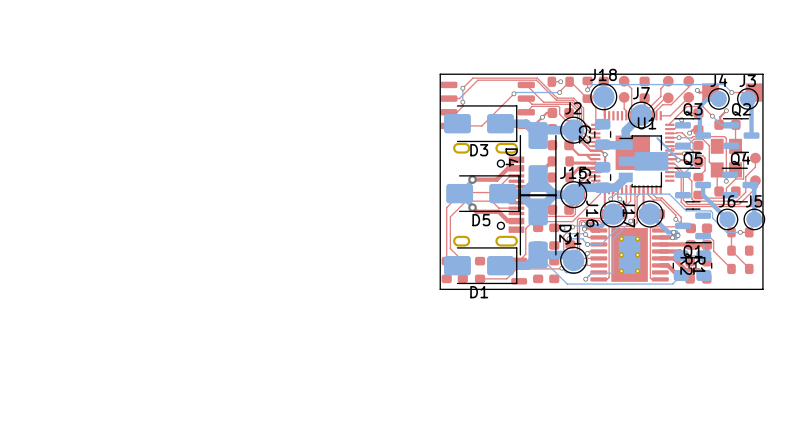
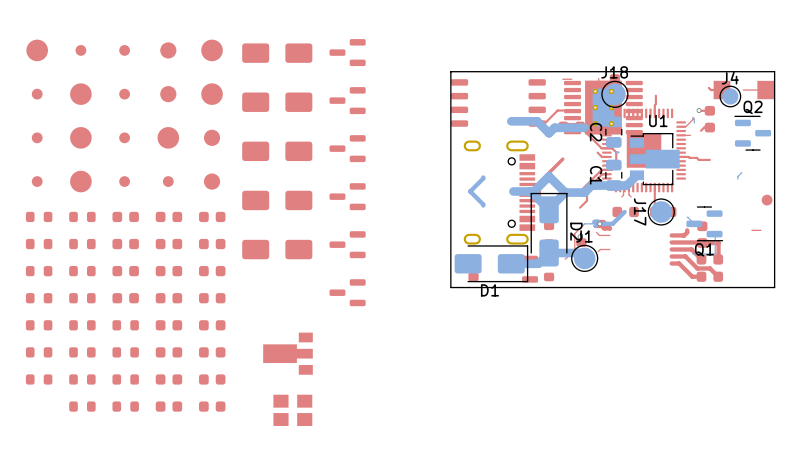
part: none -> (37, 50)
part: none -> (80, 50)
part: none -> (124, 50)
part: none -> (168, 50)
part: none -> (212, 50)
part: none -> (277, 53)
part: none -> (347, 52)
part: (560, 81) -> none
via: (560, 81) -> none
top track: (624, 81) (631, 88) (630, 115) -> none
part: (624, 81) -> none
top track: (668, 81) (660, 88) (660, 96) (647, 109) (647, 115) -> none
part: (668, 81) -> none
top track: (688, 81) (688, 87) (671, 104) (662, 104) (656, 111) (656, 115) -> none
part: (688, 81) -> none
top track: (526, 84) (543, 102) (571, 102) (579, 109) (579, 128) (588, 137) (595, 137) -> none
top track: (462, 88) (472, 78) (537, 78) (557, 98) (573, 98) (583, 108) (583, 121) (591, 129) (595, 129) -> none
bottom track: (462, 88) (462, 102) -> none
via: (462, 88) -> none
bottom track: (587, 89) (592, 84) (723, 84) (731, 92) -> none
part: (587, 89) -> none
via: (587, 89) -> none
part: (644, 89) -> none
via: (697, 90) -> none
top track: (559, 92) (570, 81) (595, 106) (595, 124) -> none
bottom track: (559, 92) (513, 93) -> none
via: (559, 92) -> none
via: (731, 92) -> none
top track: (513, 93) (481, 125) (448, 125) -> none
via: (513, 93) -> none
part: none -> (37, 94)
part: none -> (80, 94)
part: none -> (124, 94)
part: none -> (168, 94)
part: none -> (212, 94)
top track: (624, 97) (626, 115) -> none
part: (624, 97) -> none
top track: (668, 97) (665, 97) (652, 111) (652, 115) -> none
part: (668, 97) -> none
top track: (688, 97) (670, 115) (660, 115) -> none
part: (688, 97) -> none
top track: (448, 98) (459, 98) (477, 80) (536, 80) (556, 100) (572, 100) (581, 108) (581, 123) (591, 133) (595, 133) -> none
top track: (526, 98) (532, 104) (571, 104) (577, 110) (577, 130) (588, 141) (595, 141) -> none
bottom track: (718, 98) (707, 98) (699, 106) (699, 132) (703, 135) -> none
bottom track: (747, 98) (751, 102) (751, 135) -> none
J3: (747, 98) -> none
top track: (462, 102) (462, 106) (457, 112) (448, 112) -> none
via: (462, 102) -> none
part: none -> (347, 100)
part: none -> (277, 102)
top track: (726, 110) (720, 116) (720, 120) -> none
via: (726, 110) -> none
top track: (526, 112) (532, 106) (558, 106) (559, 114) (565, 120) (571, 120) (575, 124) (575, 131) (589, 146) (595, 146) -> none
part: (560, 112) -> none
bottom track: (641, 115) (625, 130) (625, 145) (602, 144) -> none
J7: (641, 115) -> none
top track: (712, 116) (702, 106) (686, 106) (669, 124) -> none
bottom track: (712, 116) (721, 125) (731, 125) -> none
via: (712, 116) -> none
via: (542, 117) -> none
via: (681, 119) -> none
top track: (736, 120) (735, 146) (743, 154) (743, 178) -> none
D3 side: bottom (480, 123) -> top (277, 151)
part: (727, 124) -> none
J2: (573, 130) -> none
top track: (669, 133) (682, 132) (687, 137) (724, 136) (726, 138) (726, 181) -> none
via: (689, 133) -> none
Q3: (692, 135) -> none
bottom track: (679, 137) (687, 137) (693, 143) (693, 164) (682, 174) -> none
via: (679, 137) -> none
bottom track: (657, 138) (678, 160) -> none
part: none -> (37, 137)
part: none -> (80, 137)
part: none -> (124, 137)
part: none -> (168, 137)
part: none -> (212, 137)
part: (560, 145) -> none
top track: (569, 145) (578, 154) (595, 154) -> none
top track: (669, 146) (686, 146) (694, 139) (702, 139) (709, 145) (709, 162) (717, 169) (717, 189) (719, 191) -> none
part: none -> (347, 148)
top track: (669, 150) (671, 148) (690, 148) (697, 155) (702, 155) (705, 158) (705, 170) (698, 177) -> none
top track: (684, 153) (669, 154) -> none
via: (684, 153) -> none
part: (698, 153) -> none
via: (605, 154) -> none
D4: (538, 158) -> none
part: (726, 158) -> none
top track: (755, 158) (755, 167) (745, 176) (745, 192) (736, 201) (694, 201) (691, 198) (691, 180) (674, 163) (669, 163) -> none
part: (755, 158) -> none
via: (678, 160) -> none
part: (560, 161) -> none
top track: (569, 161) (571, 163) (595, 163) -> none
top track: (595, 167) (578, 168) (569, 177) -> none
top track: (669, 167) (675, 167) (683, 175) (683, 200) (687, 204) (739, 204) (755, 188) (755, 180) -> none
top track: (516, 168) (508, 168) (496, 179) (472, 179) -> none
top track: (669, 172) (676, 172) (681, 176) (681, 202) (685, 206) (751, 206) (755, 202) -> none
top track: (516, 175) (510, 175) (493, 192) (461, 192) (446, 207) (446, 261) -> none
part: (560, 177) -> none
via: (472, 179) -> none
top track: (743, 179) (735, 179) (726, 188) (726, 194) (723, 198) (701, 198) (698, 194) -> none
top track: (595, 180) (584, 192) (584, 197) (575, 207) (575, 214) (573, 216) (537, 216) (525, 228) (525, 254) (519, 260) -> none
part: (755, 180) -> none
via: (726, 181) -> none
part: none -> (37, 181)
part: none -> (80, 181)
part: none -> (124, 181)
part: none -> (168, 181)
part: none -> (212, 181)
Q5: (692, 185) -> none
bottom track: (703, 185) (703, 195) (727, 219) -> none
Q4: (740, 185) -> none
bottom track: (750, 185) (754, 188) (754, 219) -> none
part: (698, 186) -> none
top track: (604, 189) (606, 214) -> none
top track: (609, 189) (609, 185) (603, 183) (600, 186) (600, 193) (572, 221) (544, 221) (538, 227) -> none
top track: (626, 189) (626, 202) (618, 204) (613, 209) (613, 217) (610, 220) (602, 220) (599, 218) (577, 219) (577, 262) (580, 265) (598, 265) -> none
top track: (630, 189) (630, 201) (625, 206) (619, 206) (616, 209) (616, 217) (610, 223) (602, 223) (598, 220) (581, 220) (579, 222) (579, 255) (582, 258) (598, 258) -> none
top track: (634, 189) (634, 216) (630, 221) -> none
top track: (639, 189) (637, 196) (637, 222) (633, 226) (609, 227) (609, 277) (607, 279) (598, 279) -> none
top track: (647, 189) (647, 194) (653, 200) (660, 200) (675, 215) (675, 219) -> none
top track: (652, 189) (652, 193) (656, 197) (661, 197) (681, 217) (681, 221) (676, 226) (650, 228) (650, 277) (660, 279) -> none
part: (727, 191) -> none
D5 side: bottom (482, 193) -> top (277, 249)
J15: (573, 194) -> none
part: none -> (347, 196)
bottom track: (610, 198) (615, 194) (669, 194) (686, 210) (710, 210) (712, 218) (726, 232) (740, 232) -> none
via: (610, 198) -> none
bottom track: (619, 199) (625, 204) (625, 220) (601, 244) (587, 244) (582, 238) (569, 238) -> none
via: (619, 199) -> none
part: none -> (277, 200)
top track: (472, 207) (476, 211) (498, 211) (508, 221) (516, 221) -> none
via: (472, 207) -> none
top track: (516, 208) (498, 208) (491, 201) (466, 201) (450, 216) (450, 248) (462, 261) -> none
part: (560, 209) -> none
J16: (613, 214) -> none
bottom track: (650, 214) (668, 232) (675, 232) (677, 234) (675, 237) (672, 237) (673, 236) (673, 232) -> none
part: none -> (39, 216)
part: none -> (82, 216)
part: none -> (125, 216)
part: none -> (168, 216)
part: none -> (212, 216)
via: (675, 219) -> none
J6: (727, 219) -> none
J5: (754, 219) -> none
bottom track: (630, 221) (613, 238) (613, 273) (591, 273) (585, 279) -> none
via: (630, 221) -> none
via: (583, 223) -> none
via: (572, 226) -> none
bottom track: (562, 228) (568, 233) (585, 234) -> none
via: (562, 228) -> none
via: (584, 229) -> none
via: (673, 232) -> none
top track: (731, 232) (731, 250) (749, 268) -> none
part: (740, 232) -> none
via: (740, 232) -> none
via: (585, 234) -> none
via: (677, 235) -> none
part: (554, 236) -> none
part: (707, 236) -> none
via: (672, 237) -> none
top track: (710, 237) (713, 240) (713, 251) (731, 268) -> none
via: (587, 244) -> none
part: none -> (39, 244)
part: none -> (82, 244)
part: none -> (125, 244)
part: none -> (168, 244)
part: none -> (212, 244)
part: none -> (347, 244)
part: (740, 250) -> none
bottom track: (587, 253) (587, 263) (578, 272) (566, 272) (561, 268) -> none
via: (587, 253) -> none
bottom track: (538, 254) (567, 284) (672, 284) (681, 275) -> none
part position: (629, 254) -> (603, 107)
top track: (519, 260) (519, 266) (506, 278) (480, 278) -> none
top track: (519, 260) (527, 268) (561, 268) -> none
R1: (681, 265) -> none
R2: (703, 265) -> none
via: (561, 268) -> none
part: (740, 268) -> none
part: (446, 270) -> none
part: (480, 270) -> none
part: (554, 270) -> none
part: none -> (39, 271)
part: none -> (82, 271)
part: none -> (125, 271)
part: none -> (168, 271)
part: none -> (212, 271)
via: (585, 279) -> none
part: none -> (347, 292)
part: none -> (39, 298)
part: none -> (82, 298)
part: none -> (125, 298)
part: none -> (168, 298)
part: none -> (212, 298)
part: none -> (39, 325)
part: none -> (82, 325)
part: none -> (125, 325)
part: none -> (168, 325)
part: none -> (212, 325)
part: none -> (39, 352)
part: none -> (82, 352)
part: none -> (125, 352)
part: none -> (168, 352)
part: none -> (212, 352)
part: none -> (288, 353)
part: none -> (39, 379)
part: none -> (82, 379)
part: none -> (125, 379)
part: none -> (168, 379)
part: none -> (212, 379)
part: none -> (82, 406)
part: none -> (125, 406)
part: none -> (168, 406)
part: none -> (212, 406)
part: none -> (292, 410)

